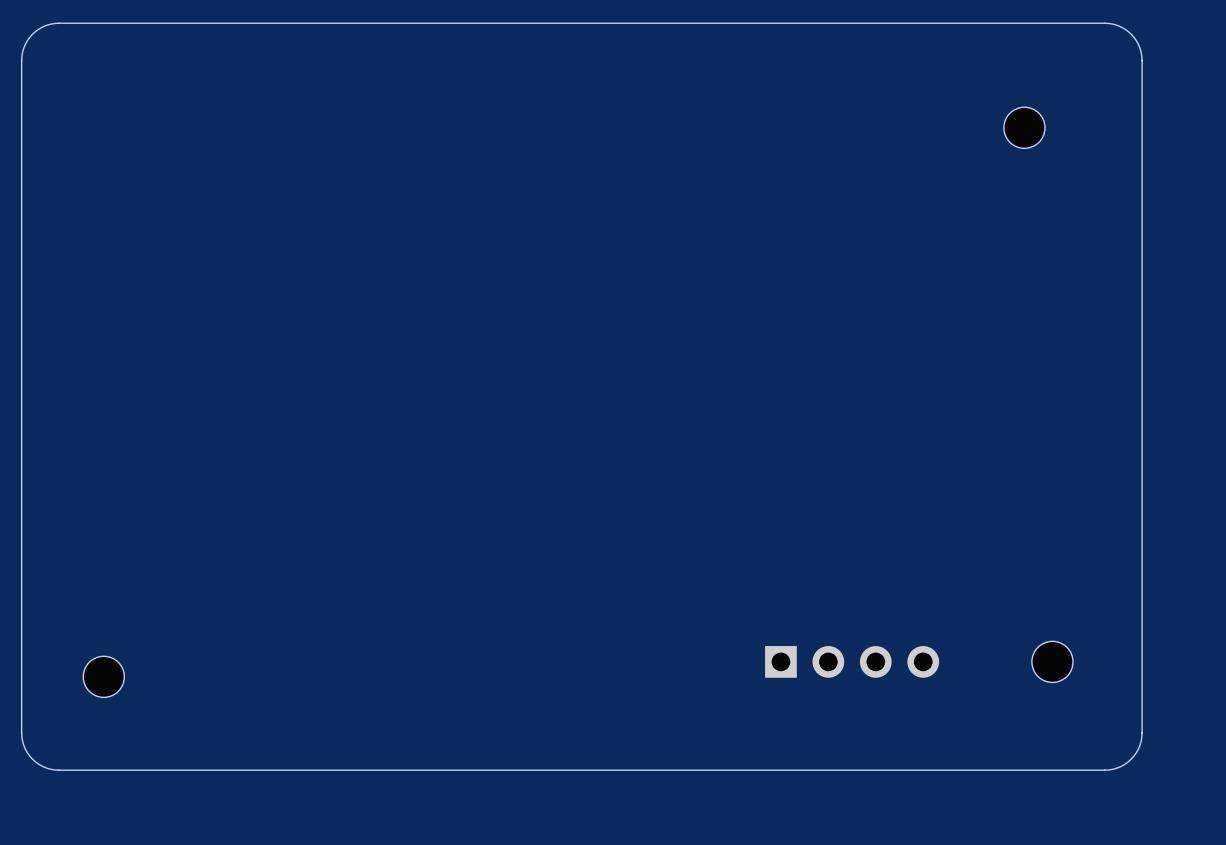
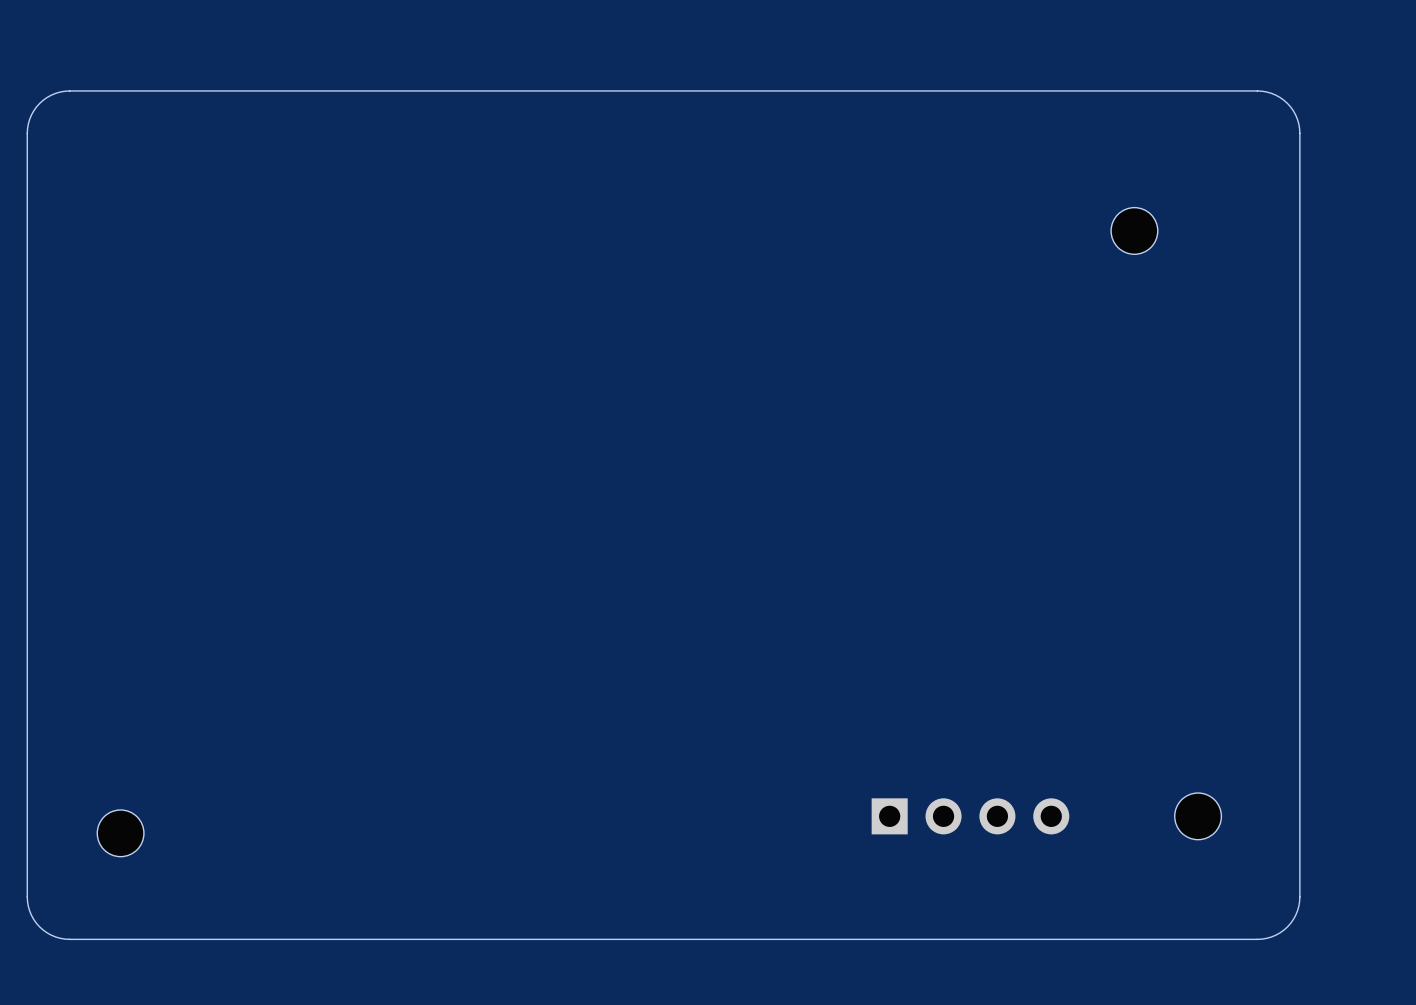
part position: (1024, 127) -> (1134, 230)

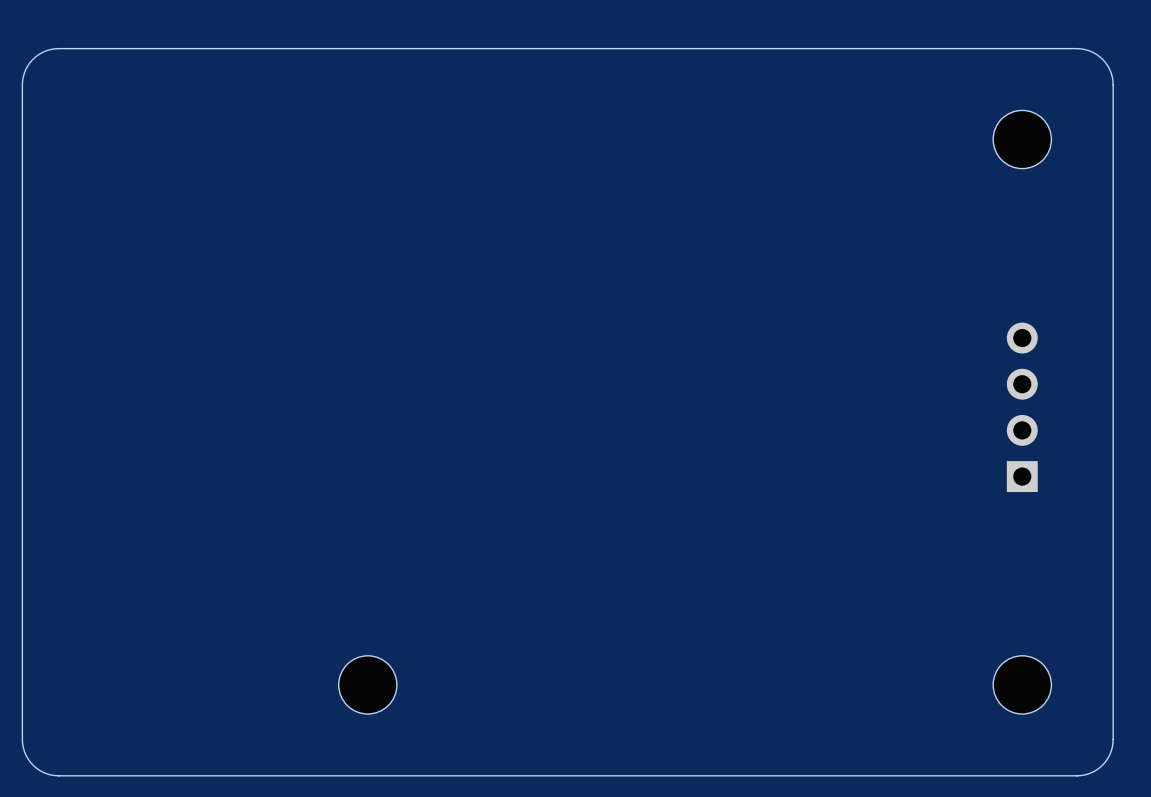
part: none -> (1022, 139)
part: (1134, 230) -> none
part footprint: [1174, 793, 1222, 840] -> [993, 655, 1052, 715]
part rotation: 0° (970, 816) -> 90° counterclockwise (1022, 407)
part position: (970, 816) -> (1022, 407)
part: (120, 833) -> none
part: none -> (367, 684)

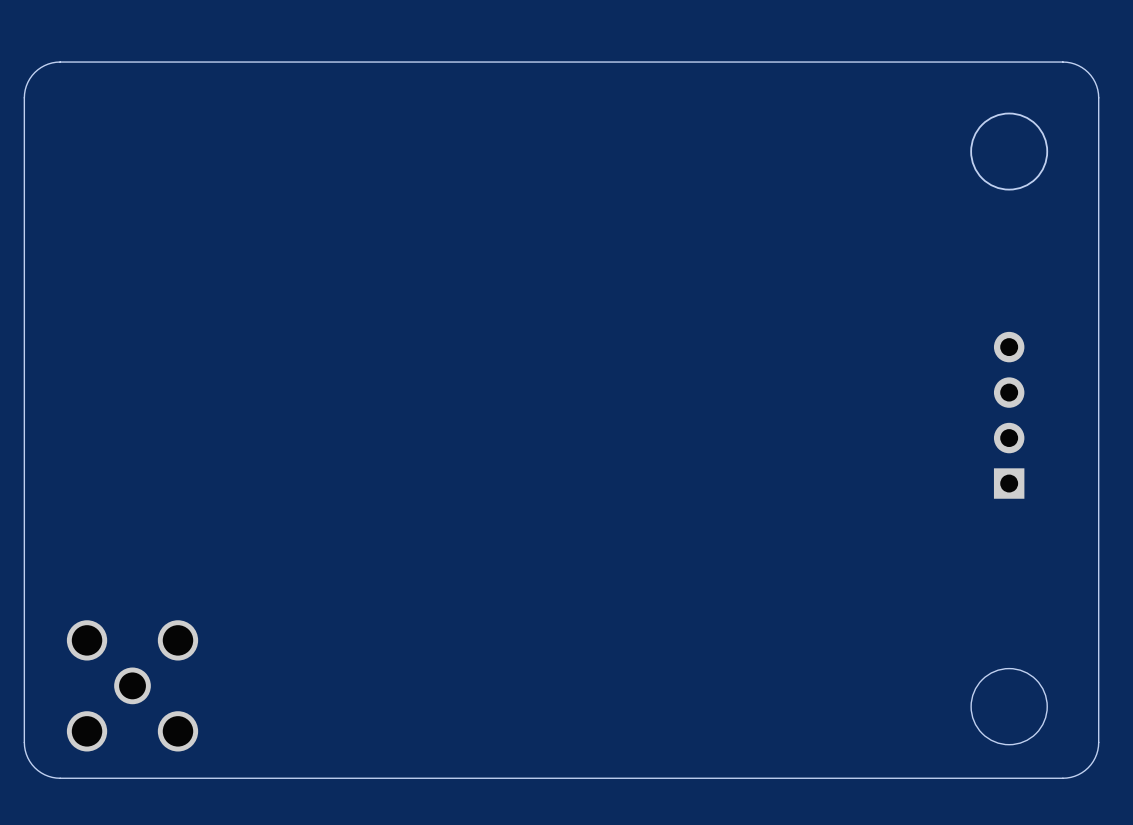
round board edge: none -> [970, 112, 1049, 191]
part: (1022, 139) -> none
round board edge: none -> [970, 668, 1048, 746]
part: none -> (132, 685)
part: (367, 684) -> none
part: (1022, 684) -> none

